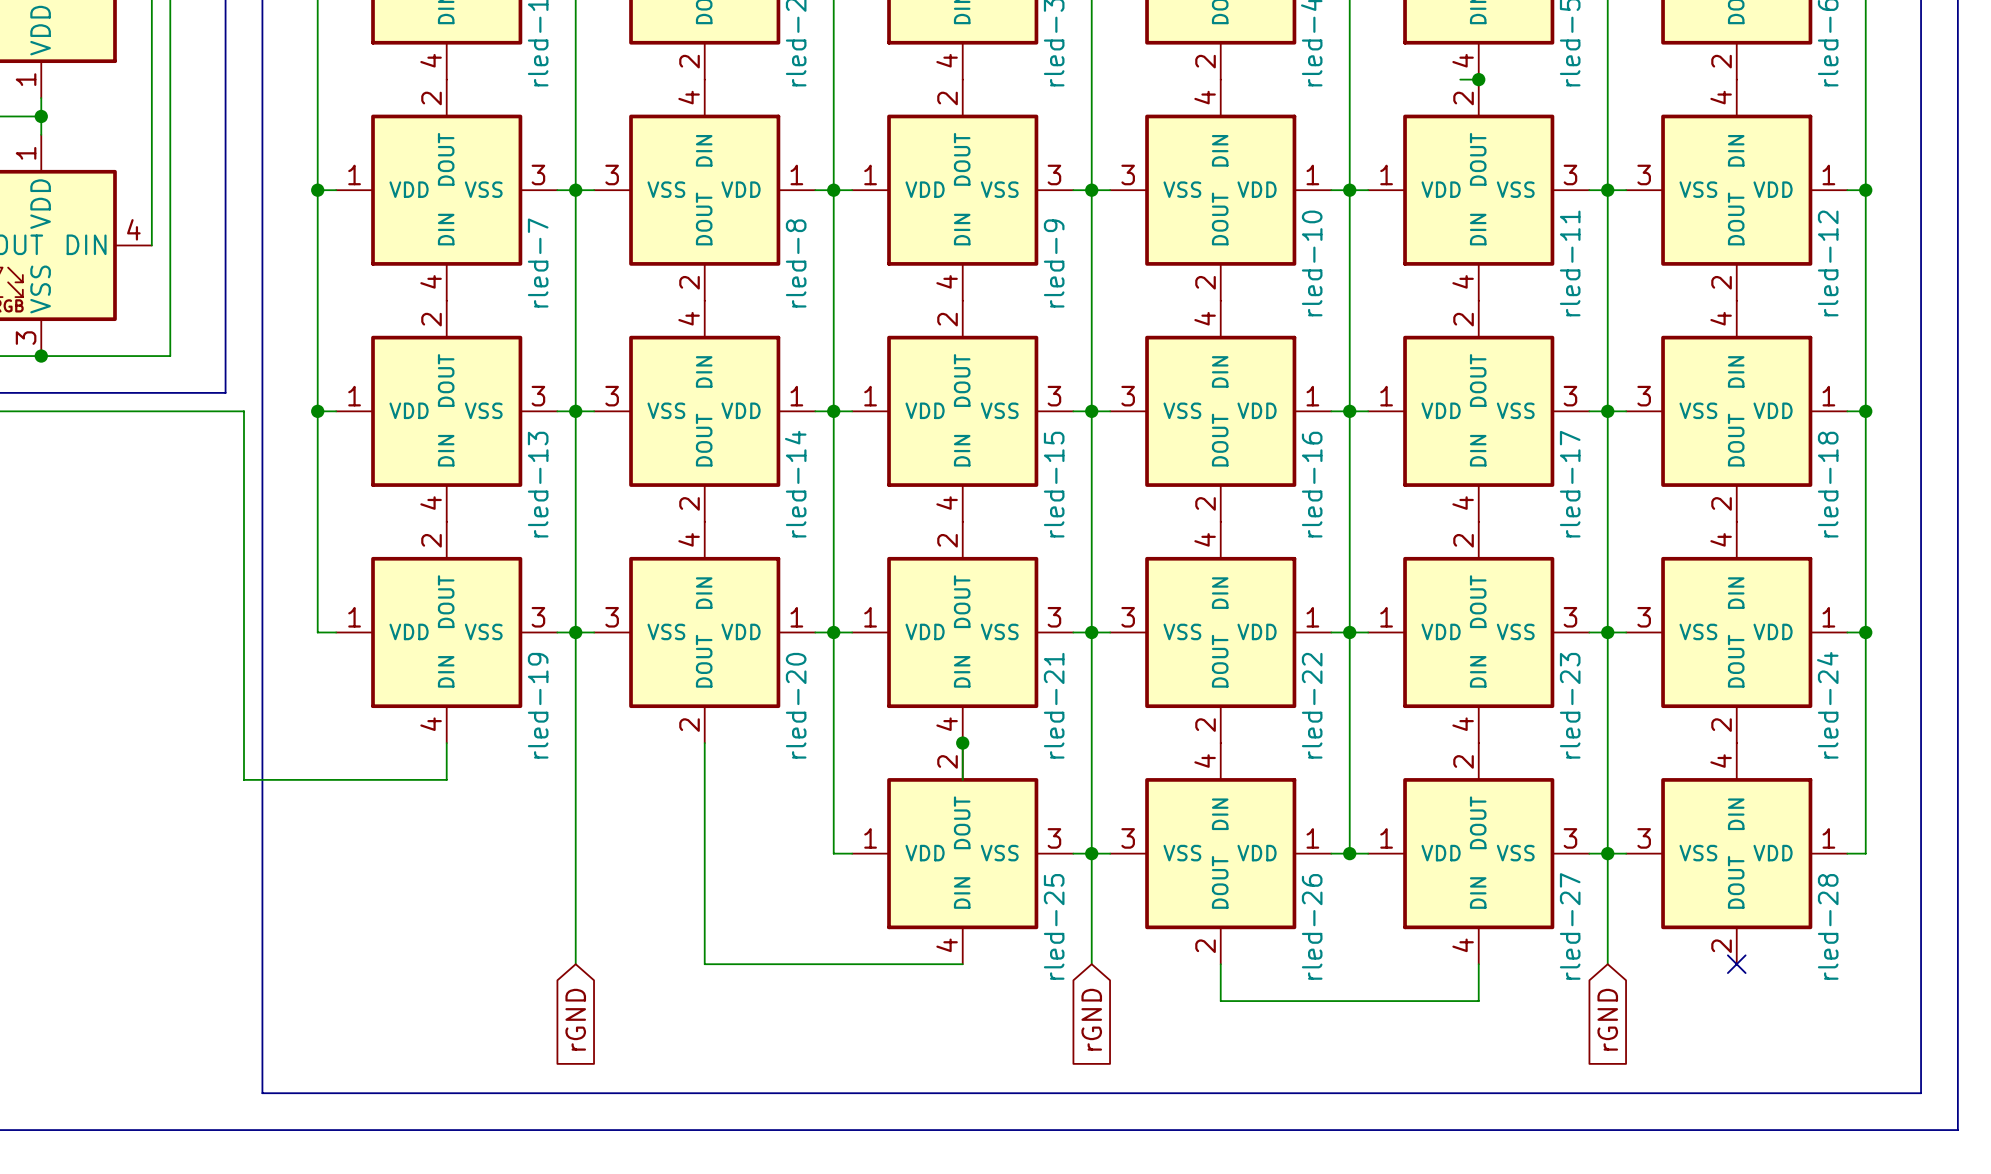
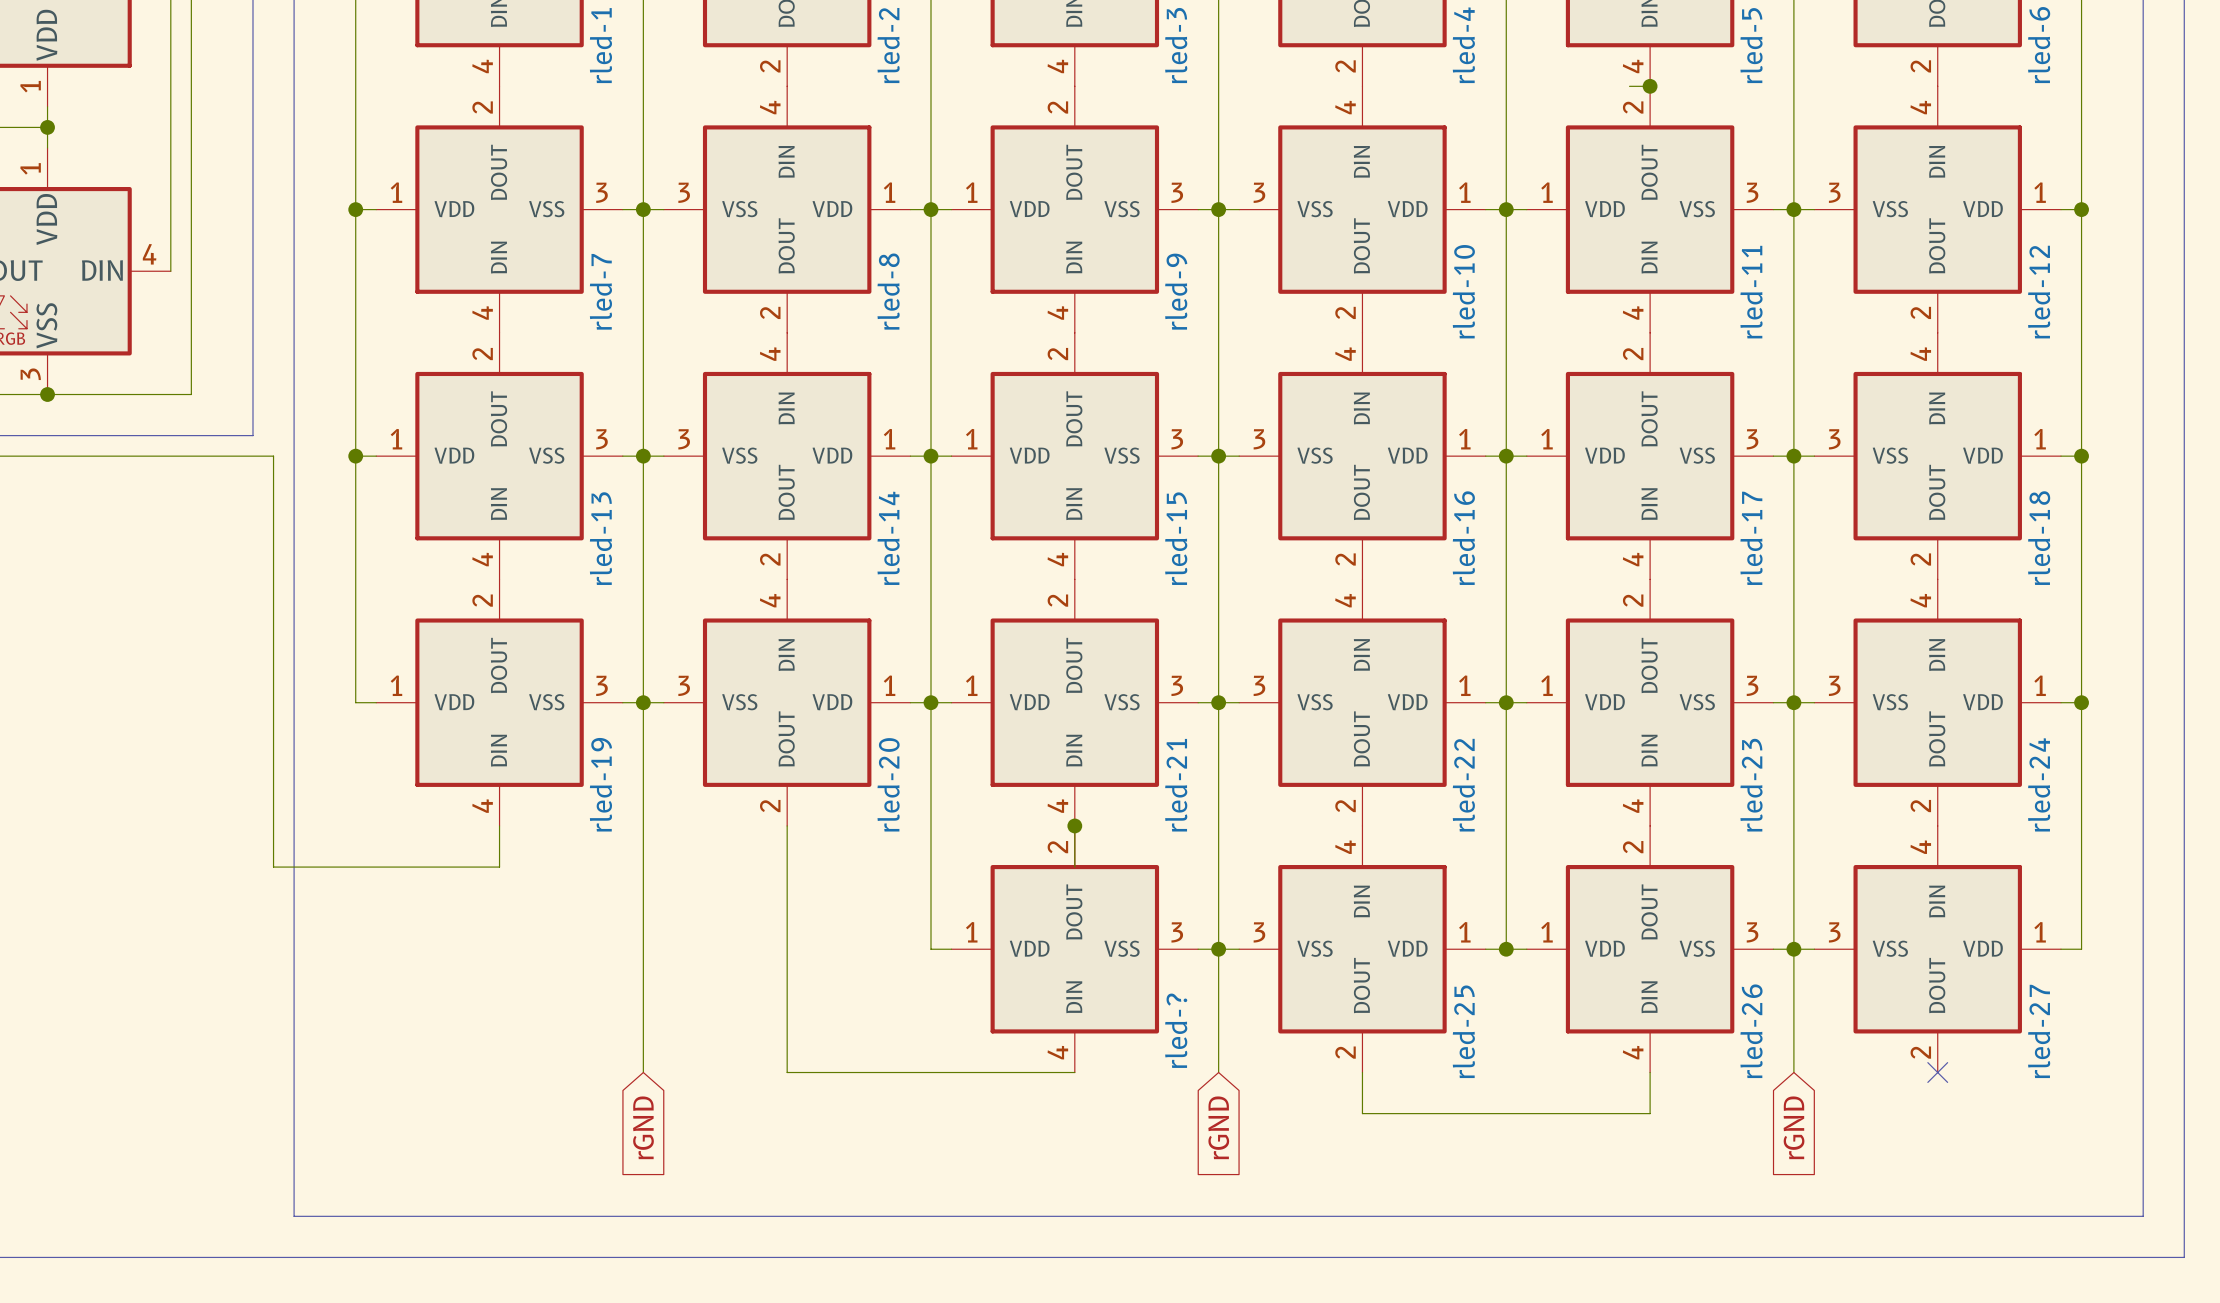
rled-25 name: rled-25 (1054, 926) -> rled-? (1176, 1030)
rled-26 name: rled-26 (1312, 926) -> rled-25 (1463, 1031)
rled-27 name: rled-27 (1570, 926) -> rled-26 (1751, 1031)
rled-28 name: rled-28 (1828, 926) -> rled-27 (2039, 1031)

